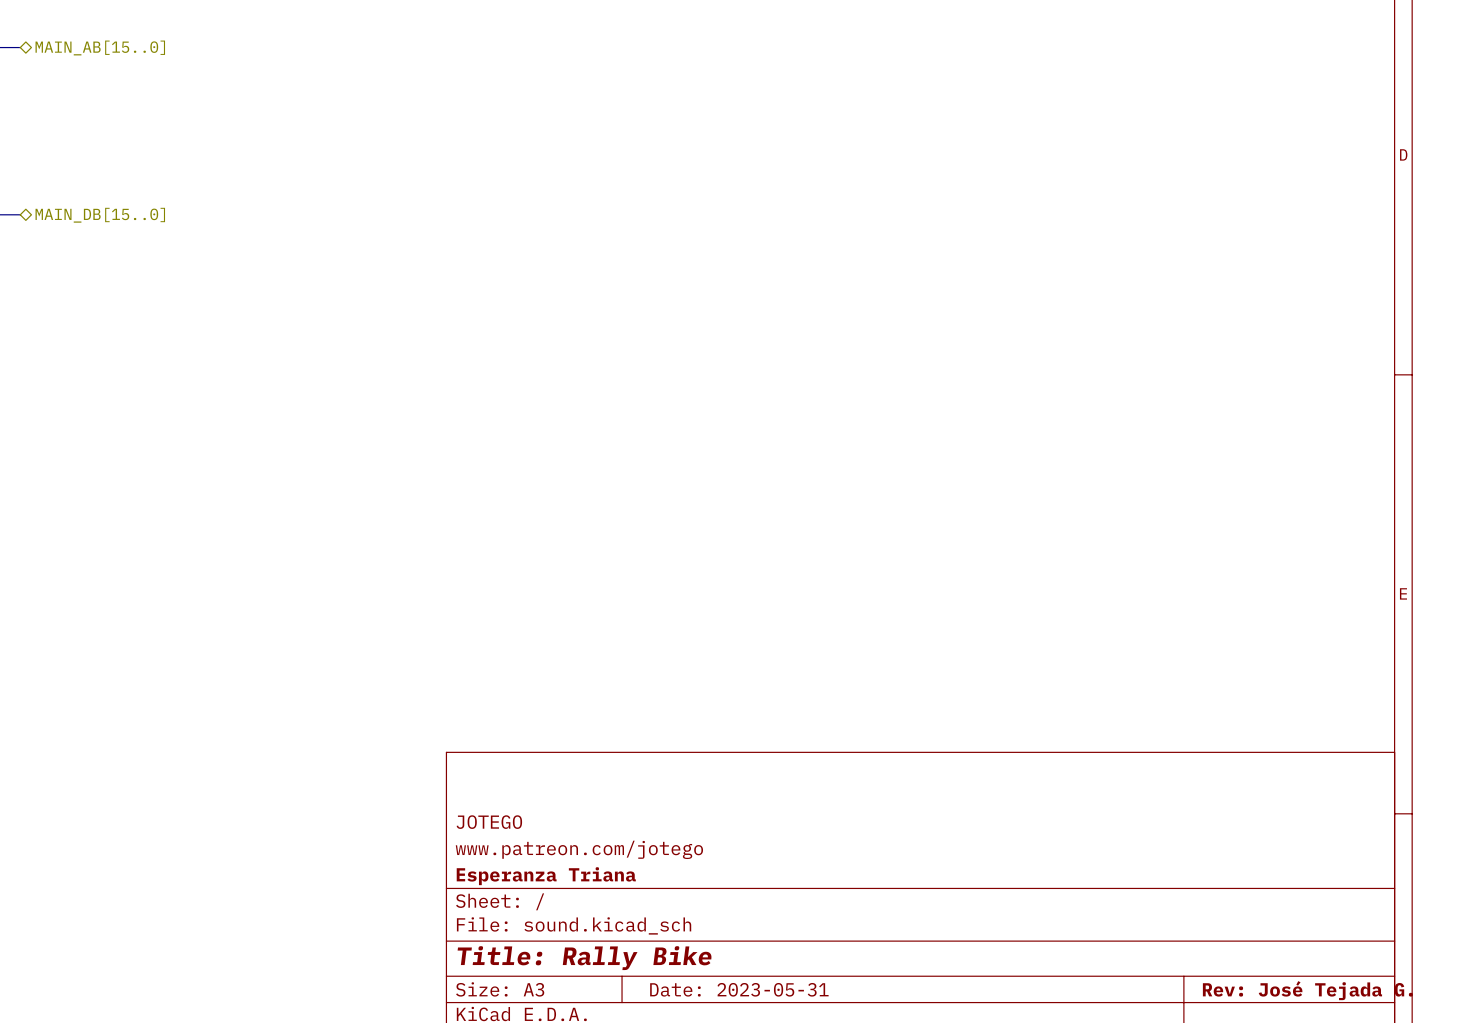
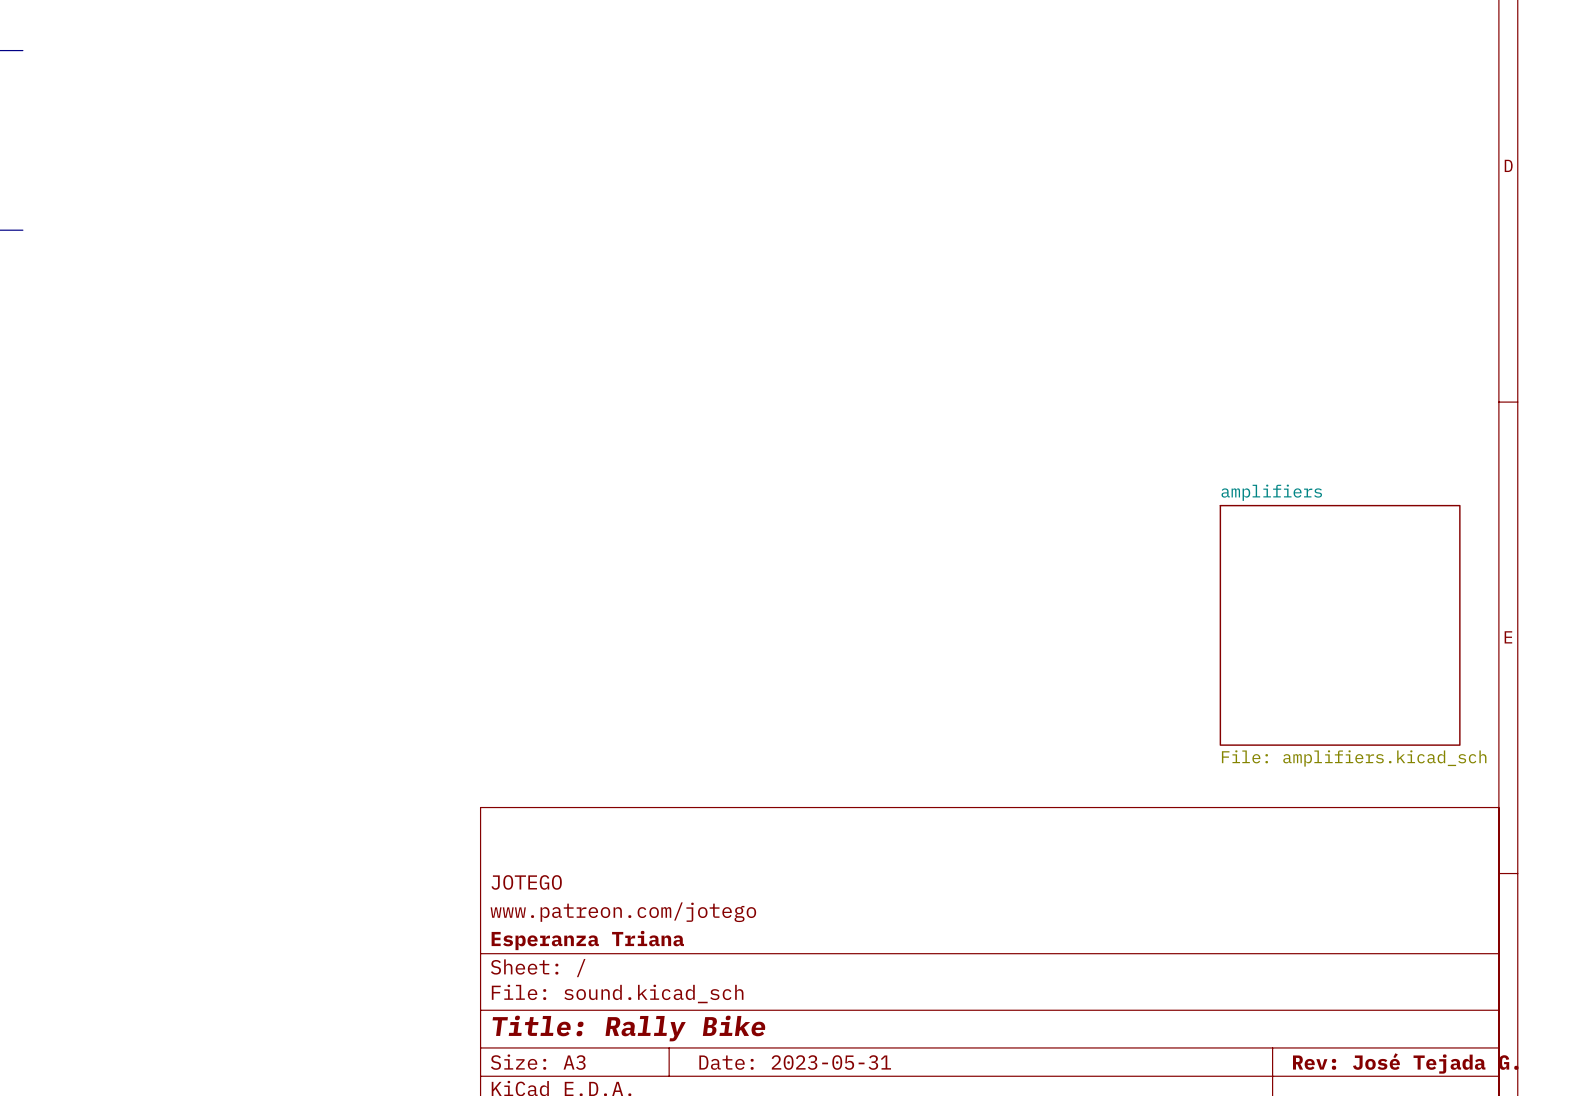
hierarchical label: MAIN_AB[15..0] (100, 47) -> none
hierarchical label: MAIN_DB[15..0] (100, 215) -> none
sheet amplifiers: none -> File: amplifiers.kicad_sch (1340, 625)

